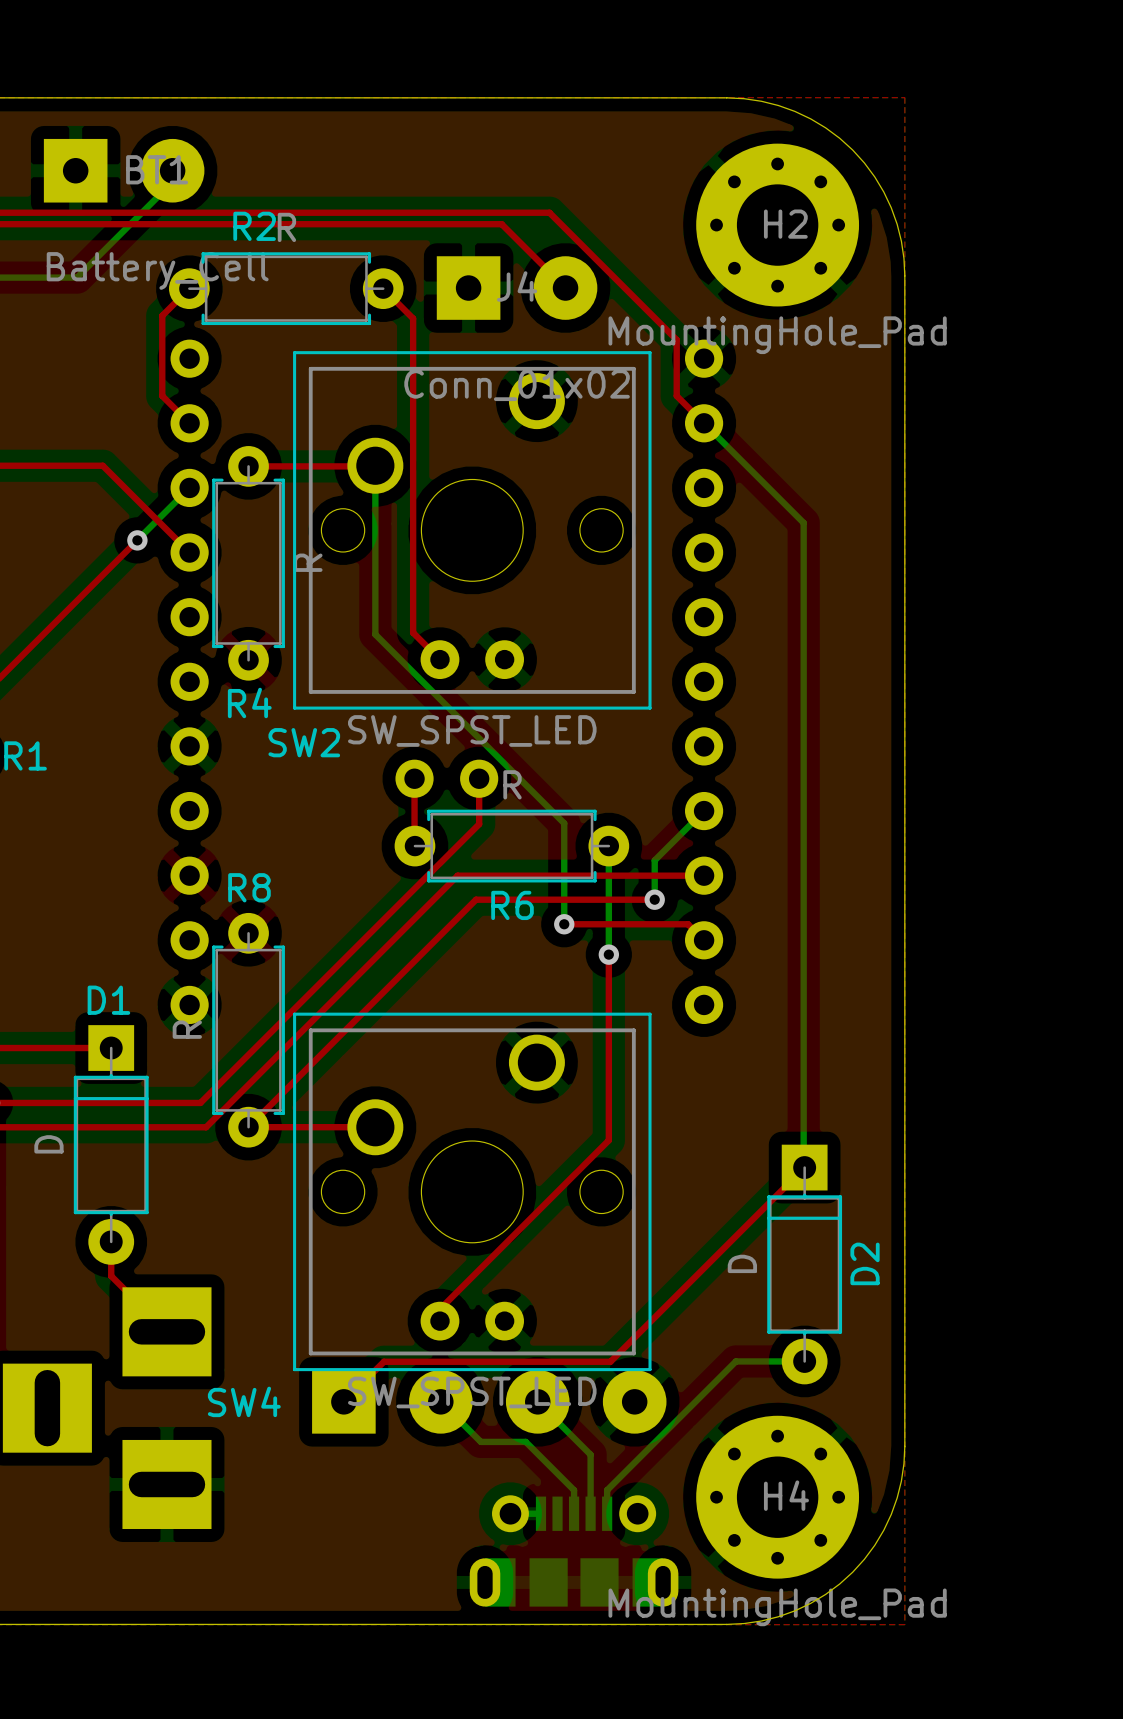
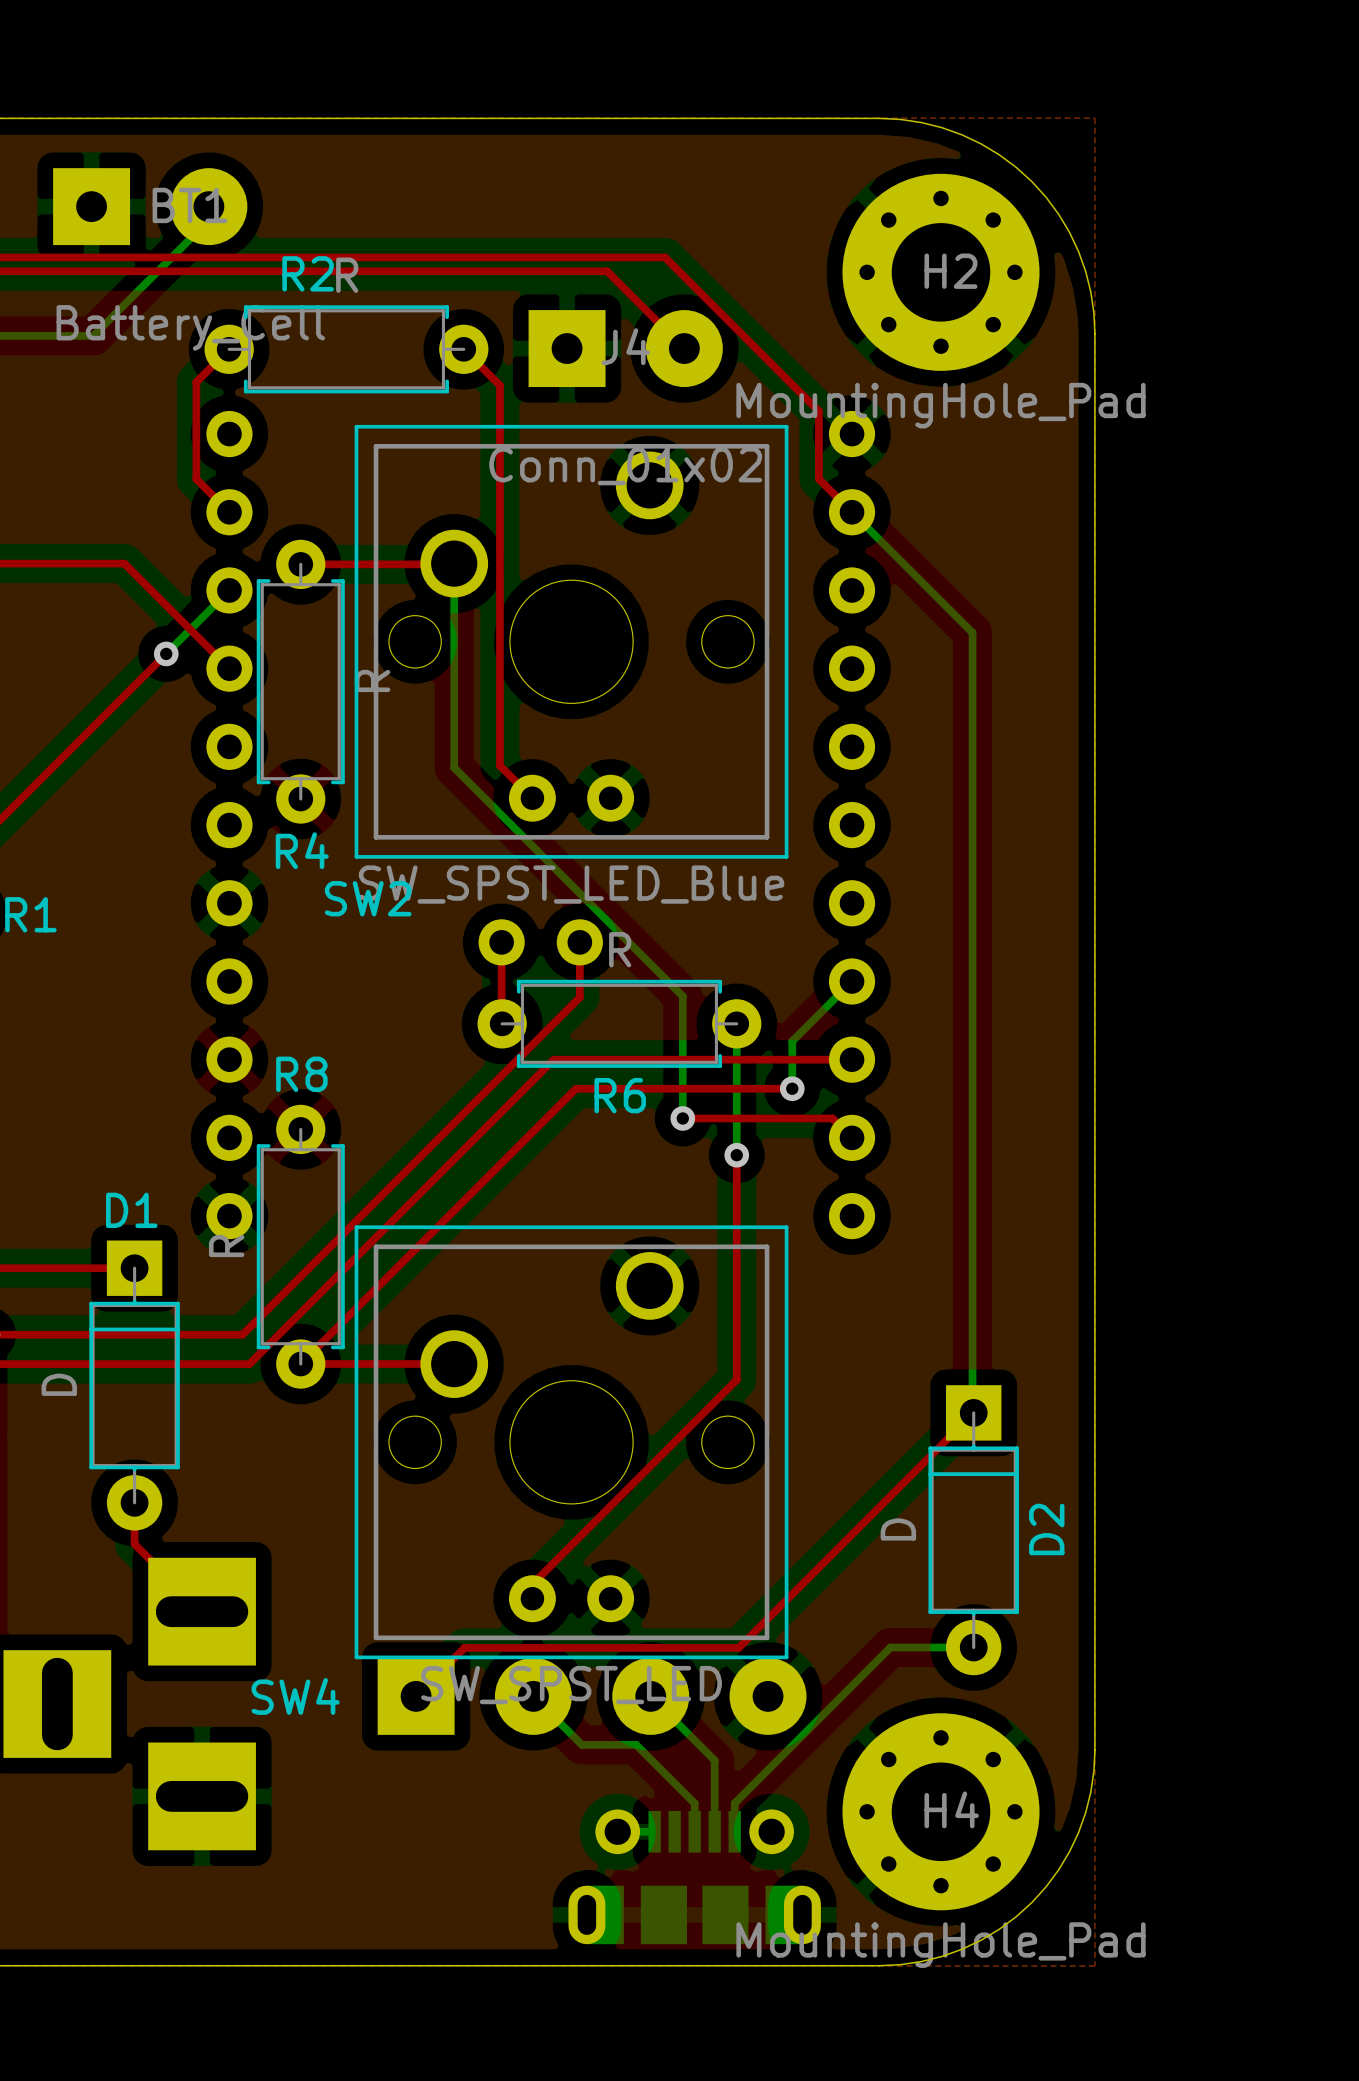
SW2 value: SW_SPST_LED (472, 730) -> SW_SPST_LED_Blue (571, 884)

